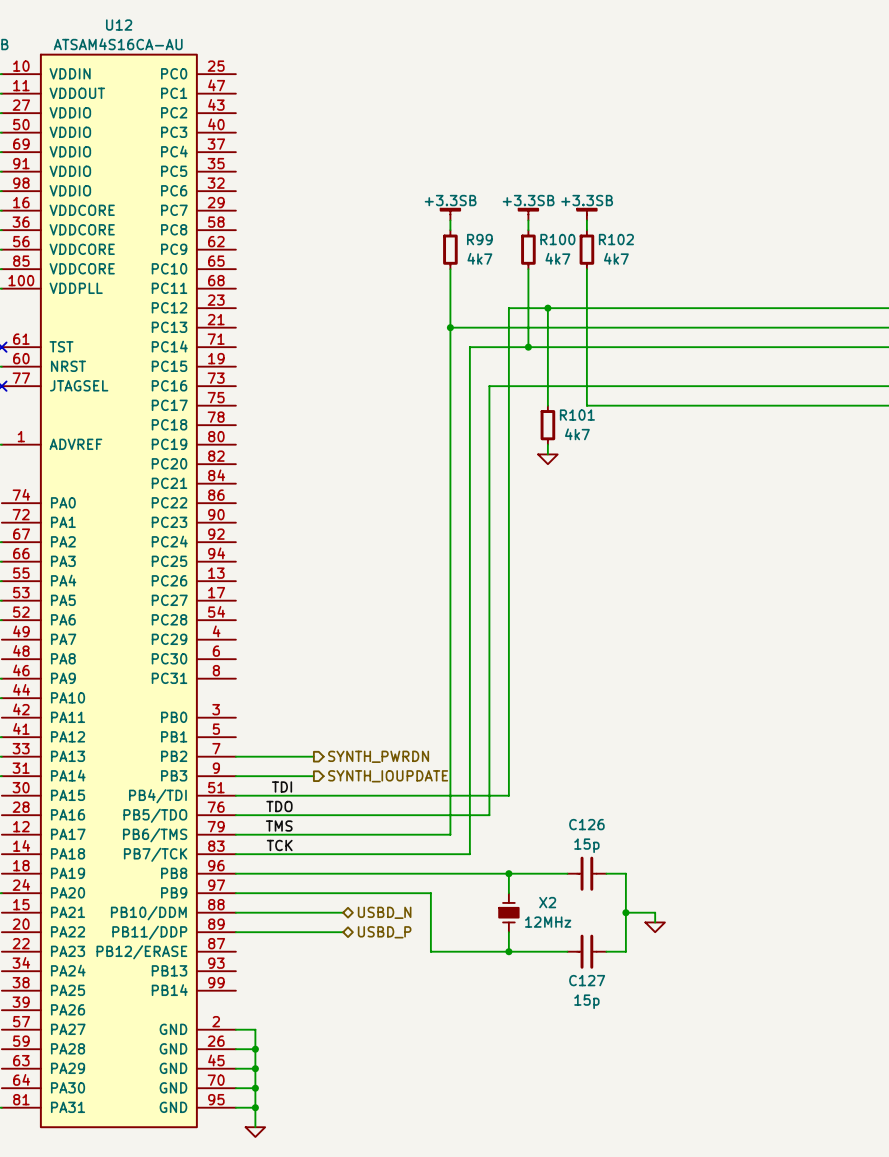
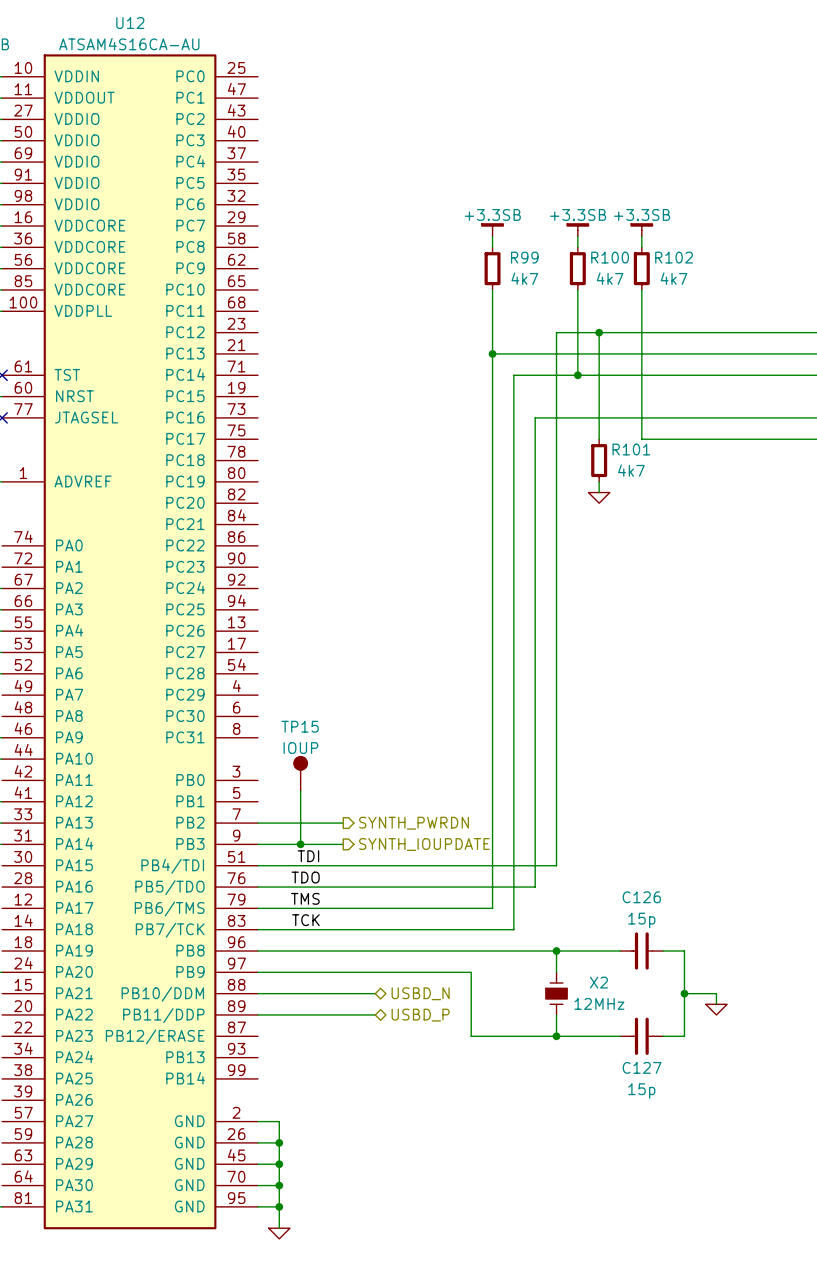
TP15: none -> IOUP (300, 773)
wire: none -> (300, 791) (300, 844)
junction: none -> (300, 844)

